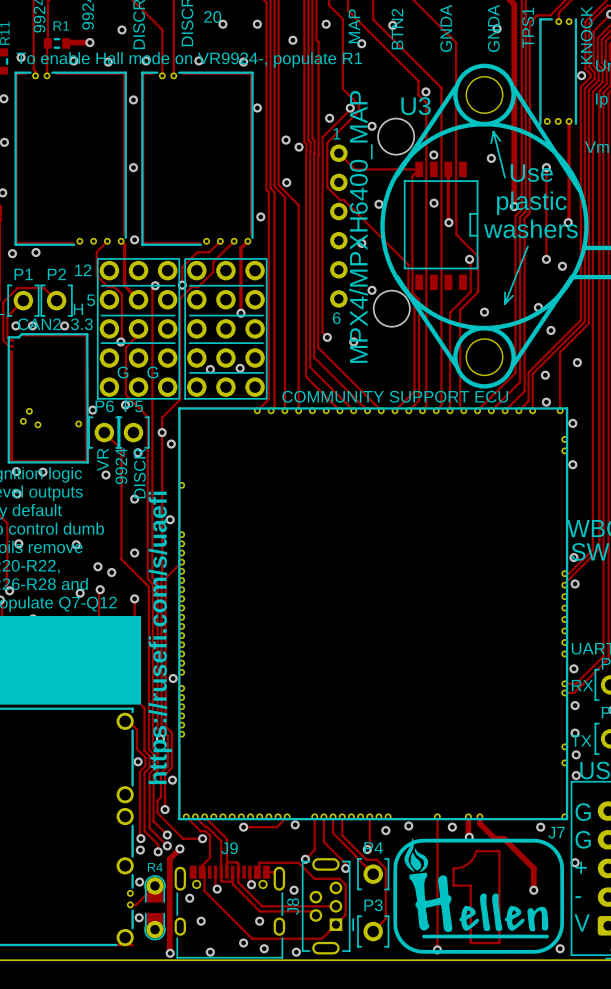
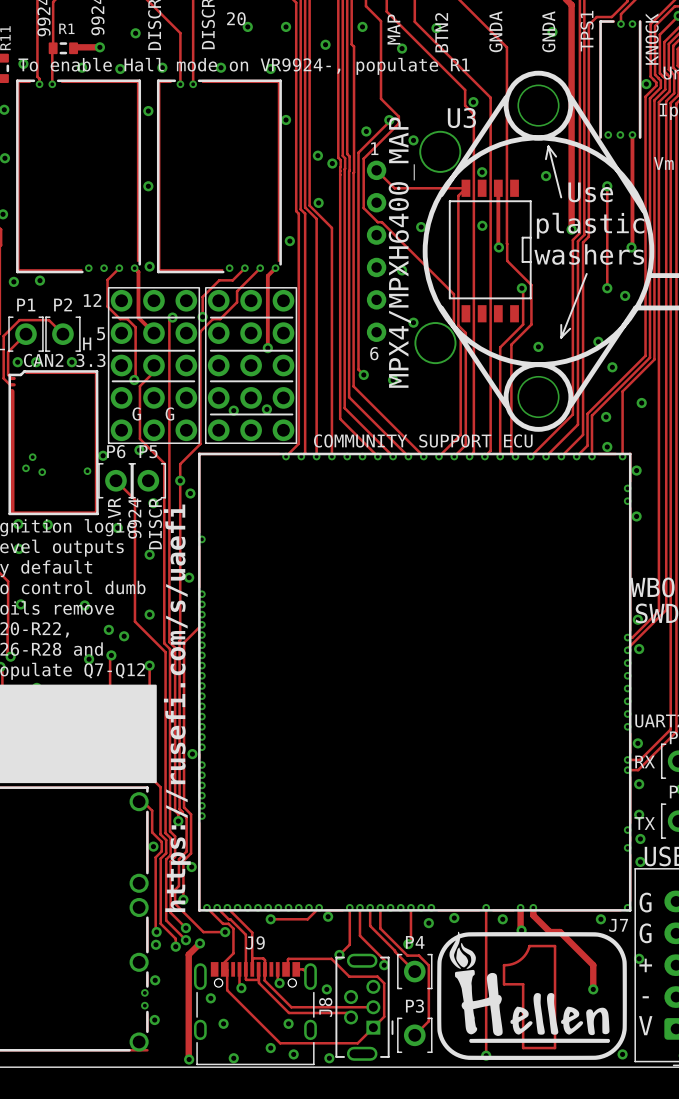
track: (155, 885) (136, 904) (130, 904) -> none
R4: (154, 907) -> none

